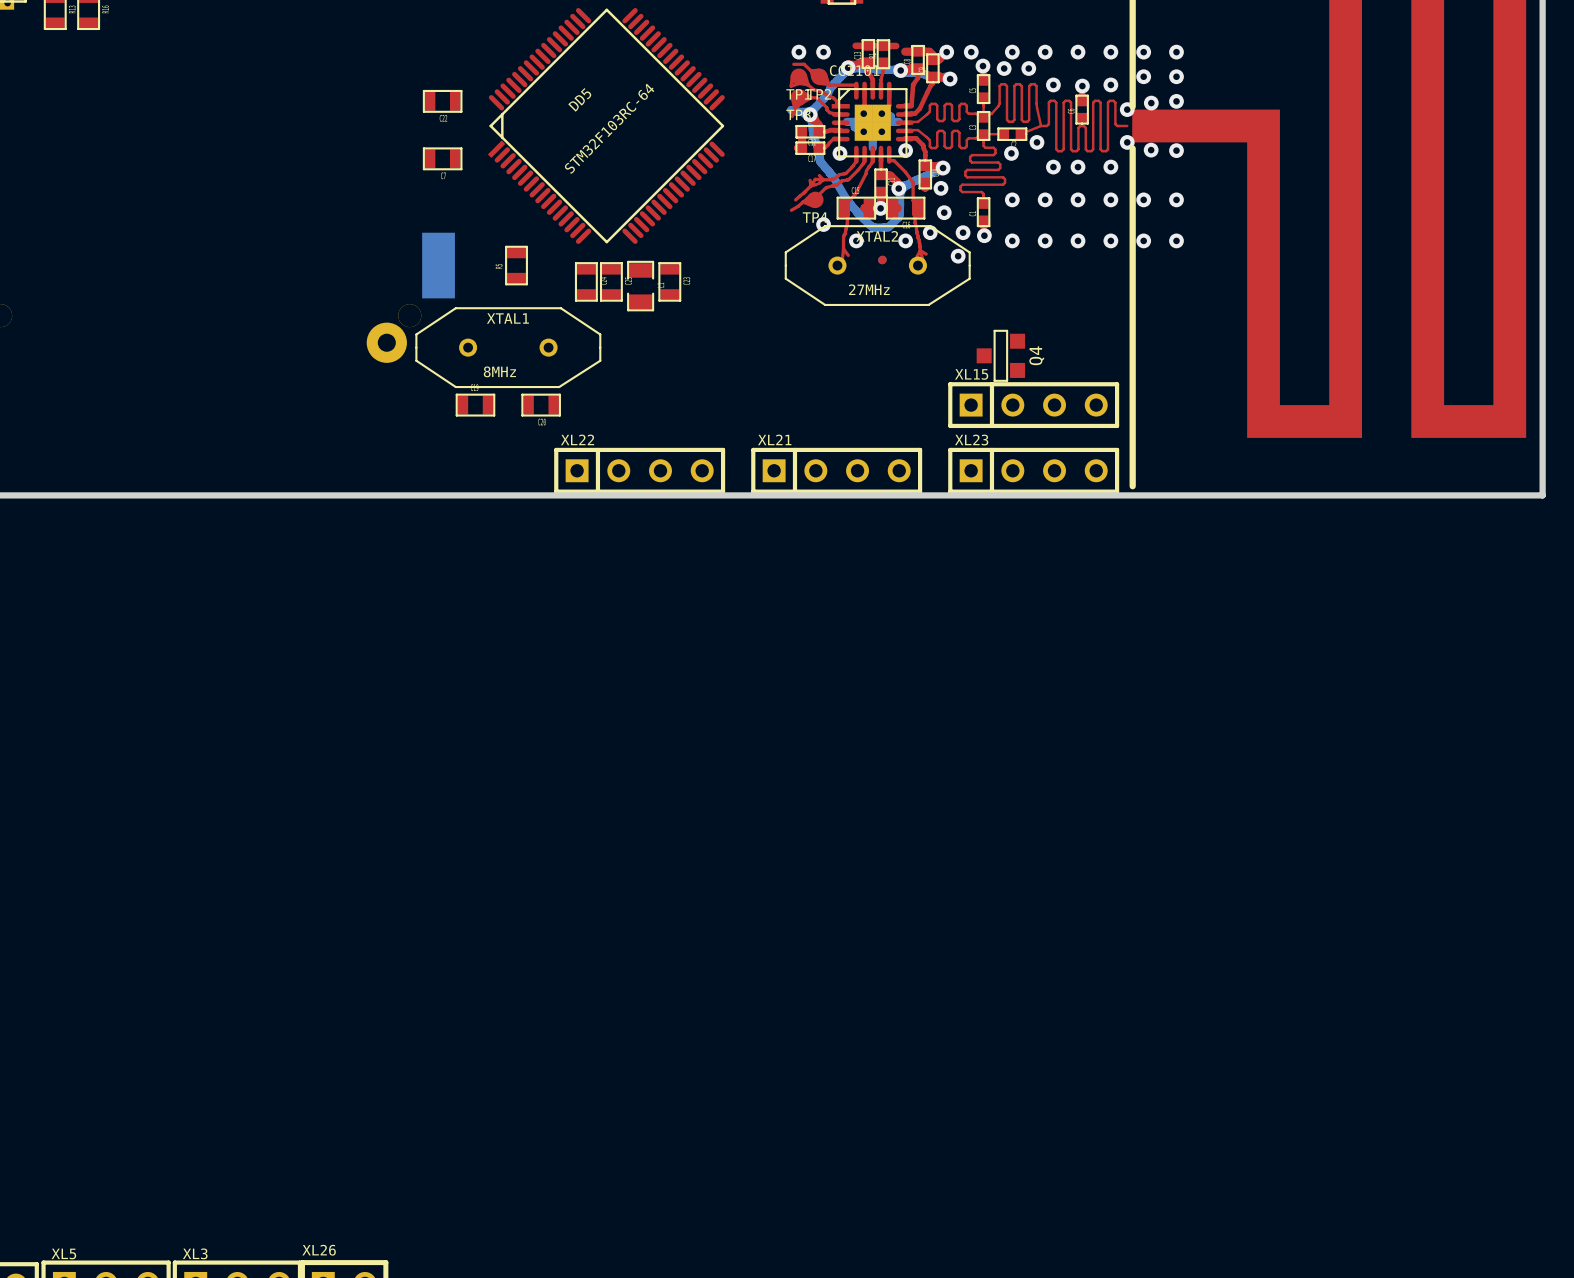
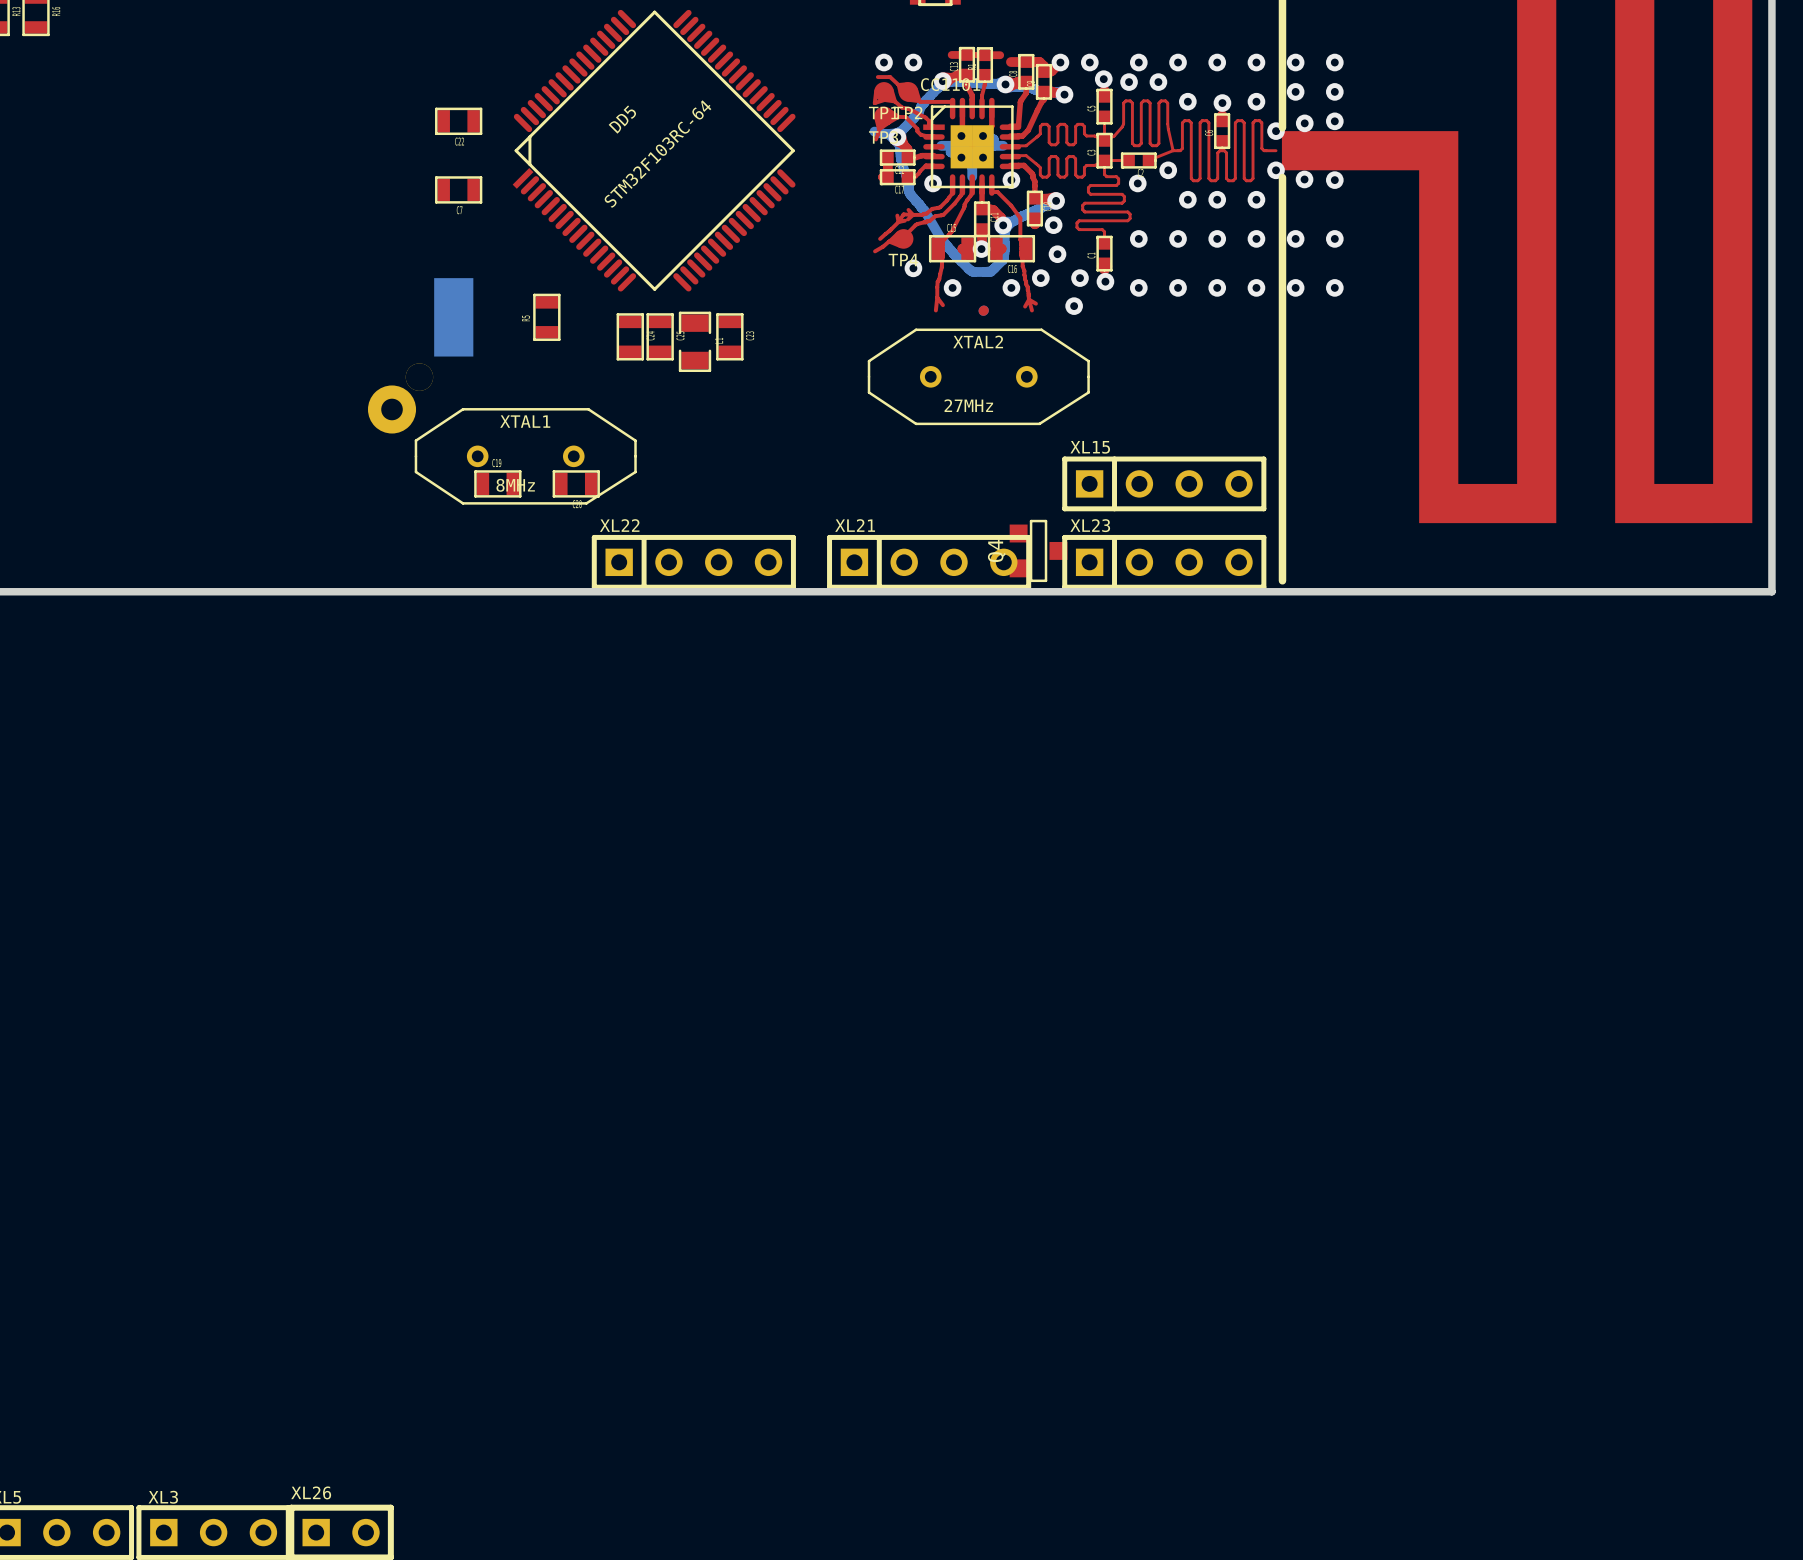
XTAL2 position: (877, 265) -> (978, 376)
XTAL1 position: (508, 347) -> (525, 456)
Q4 rotation: 0° (1000, 355) -> 180° (1038, 550)
Q4 position: (1000, 355) -> (1038, 550)

